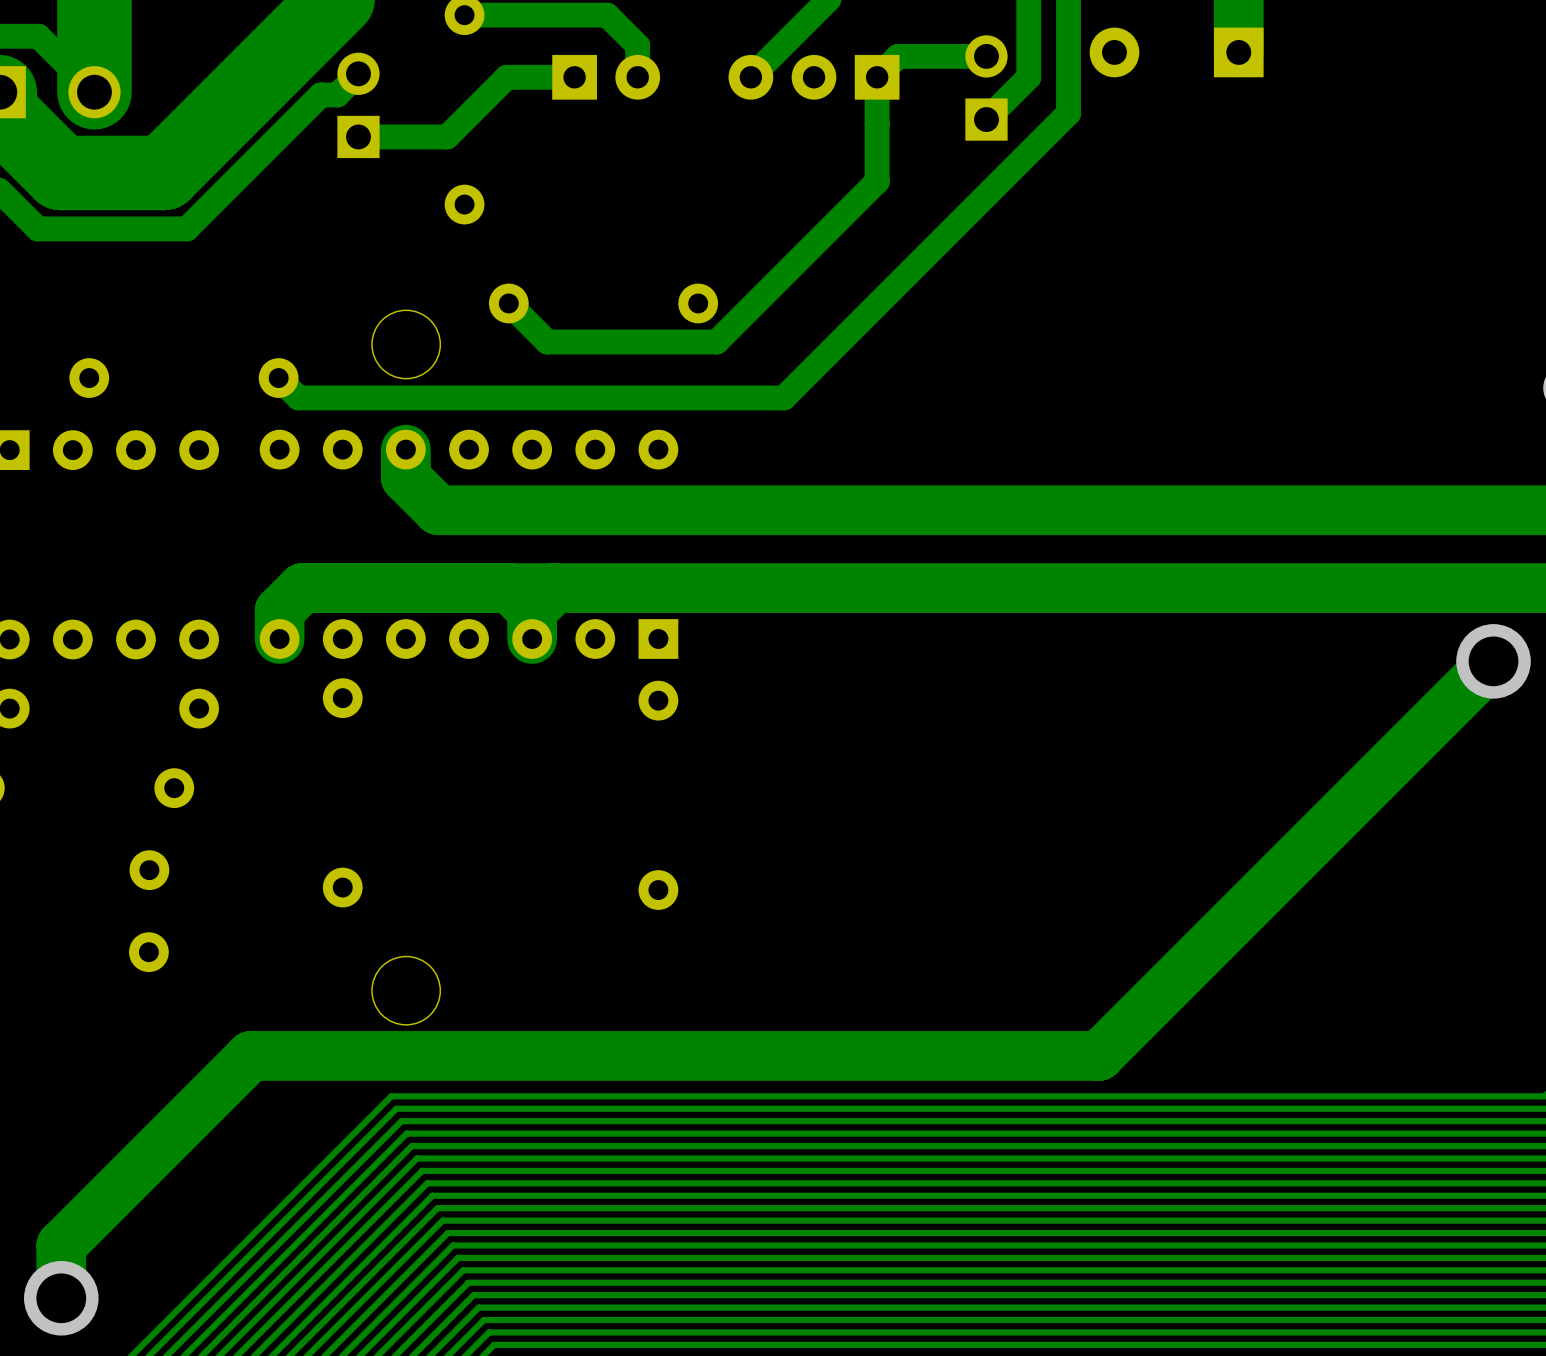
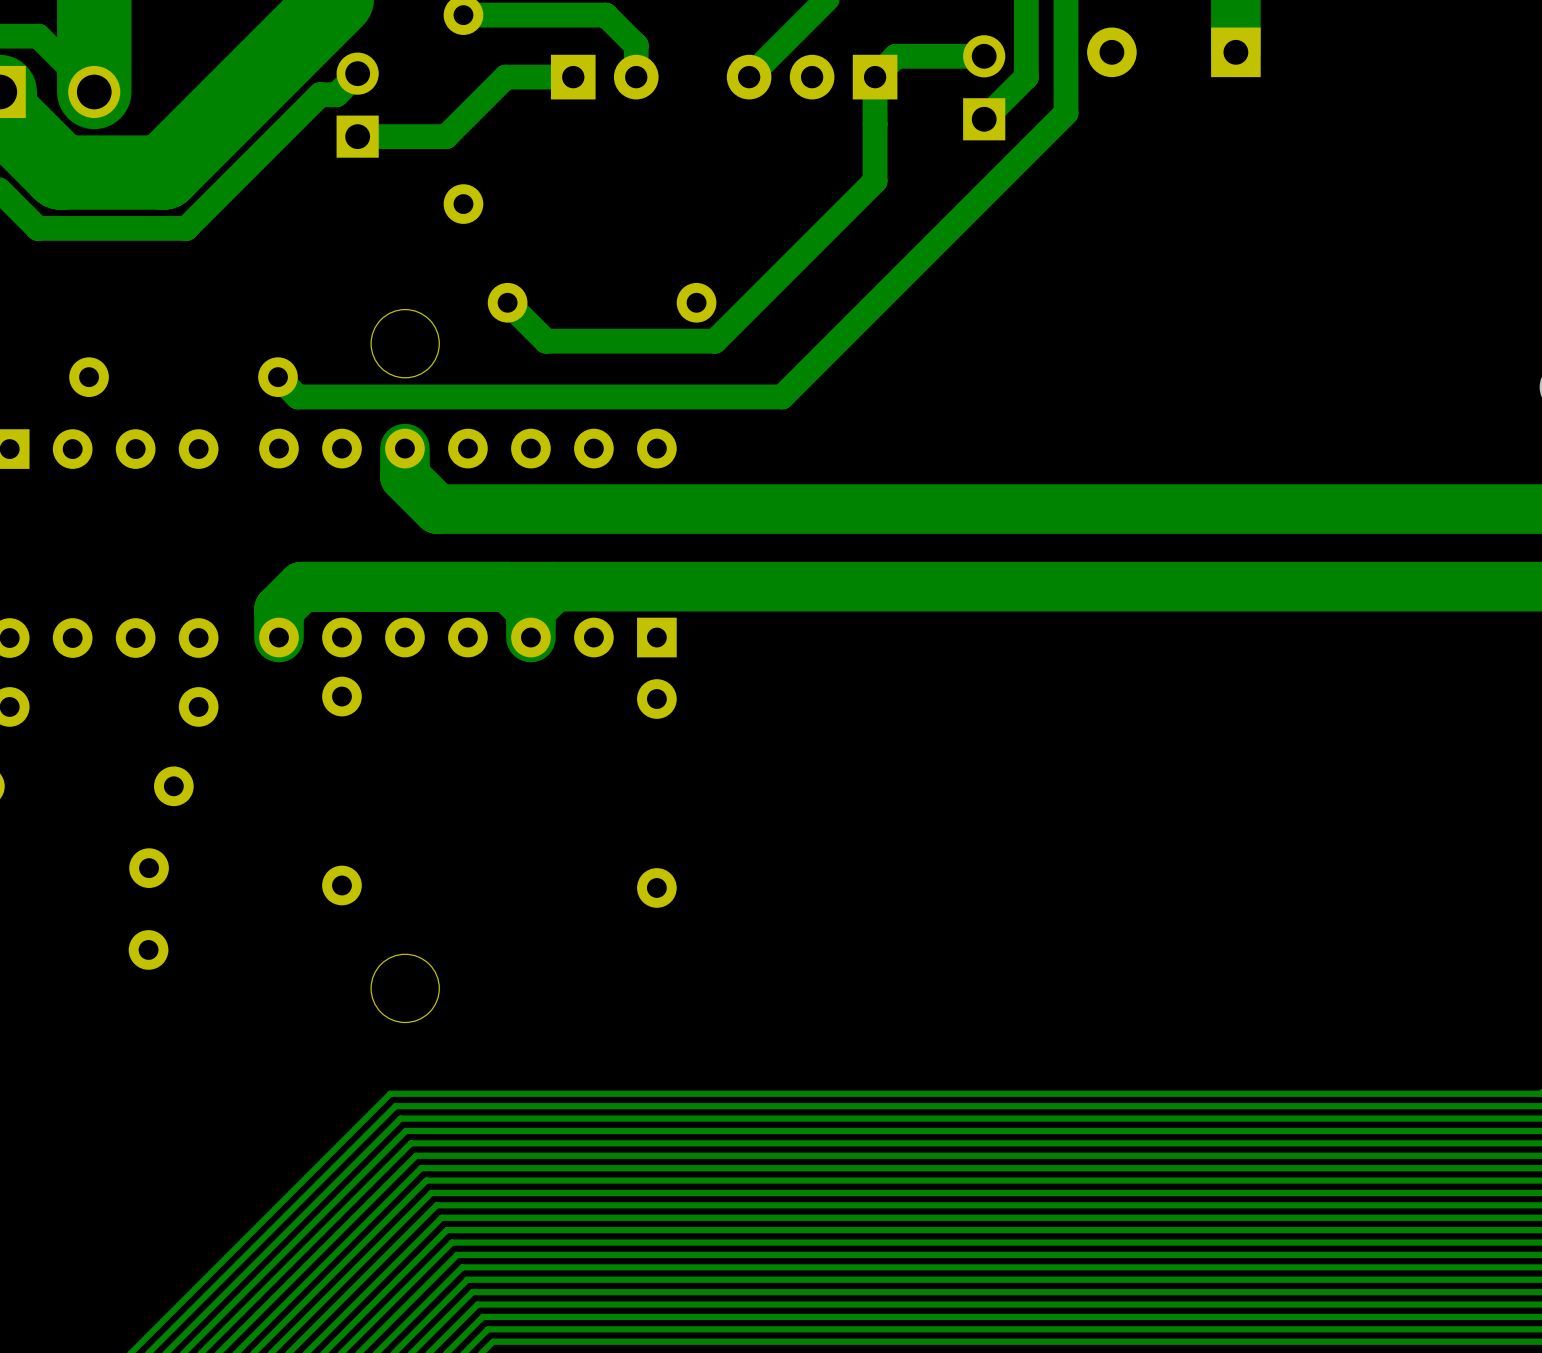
track: (1493, 661) (1098, 1055) (250, 1055) (61, 1245) (61, 1298) -> none
via: (1493, 661) -> none
via: (61, 1298) -> none

